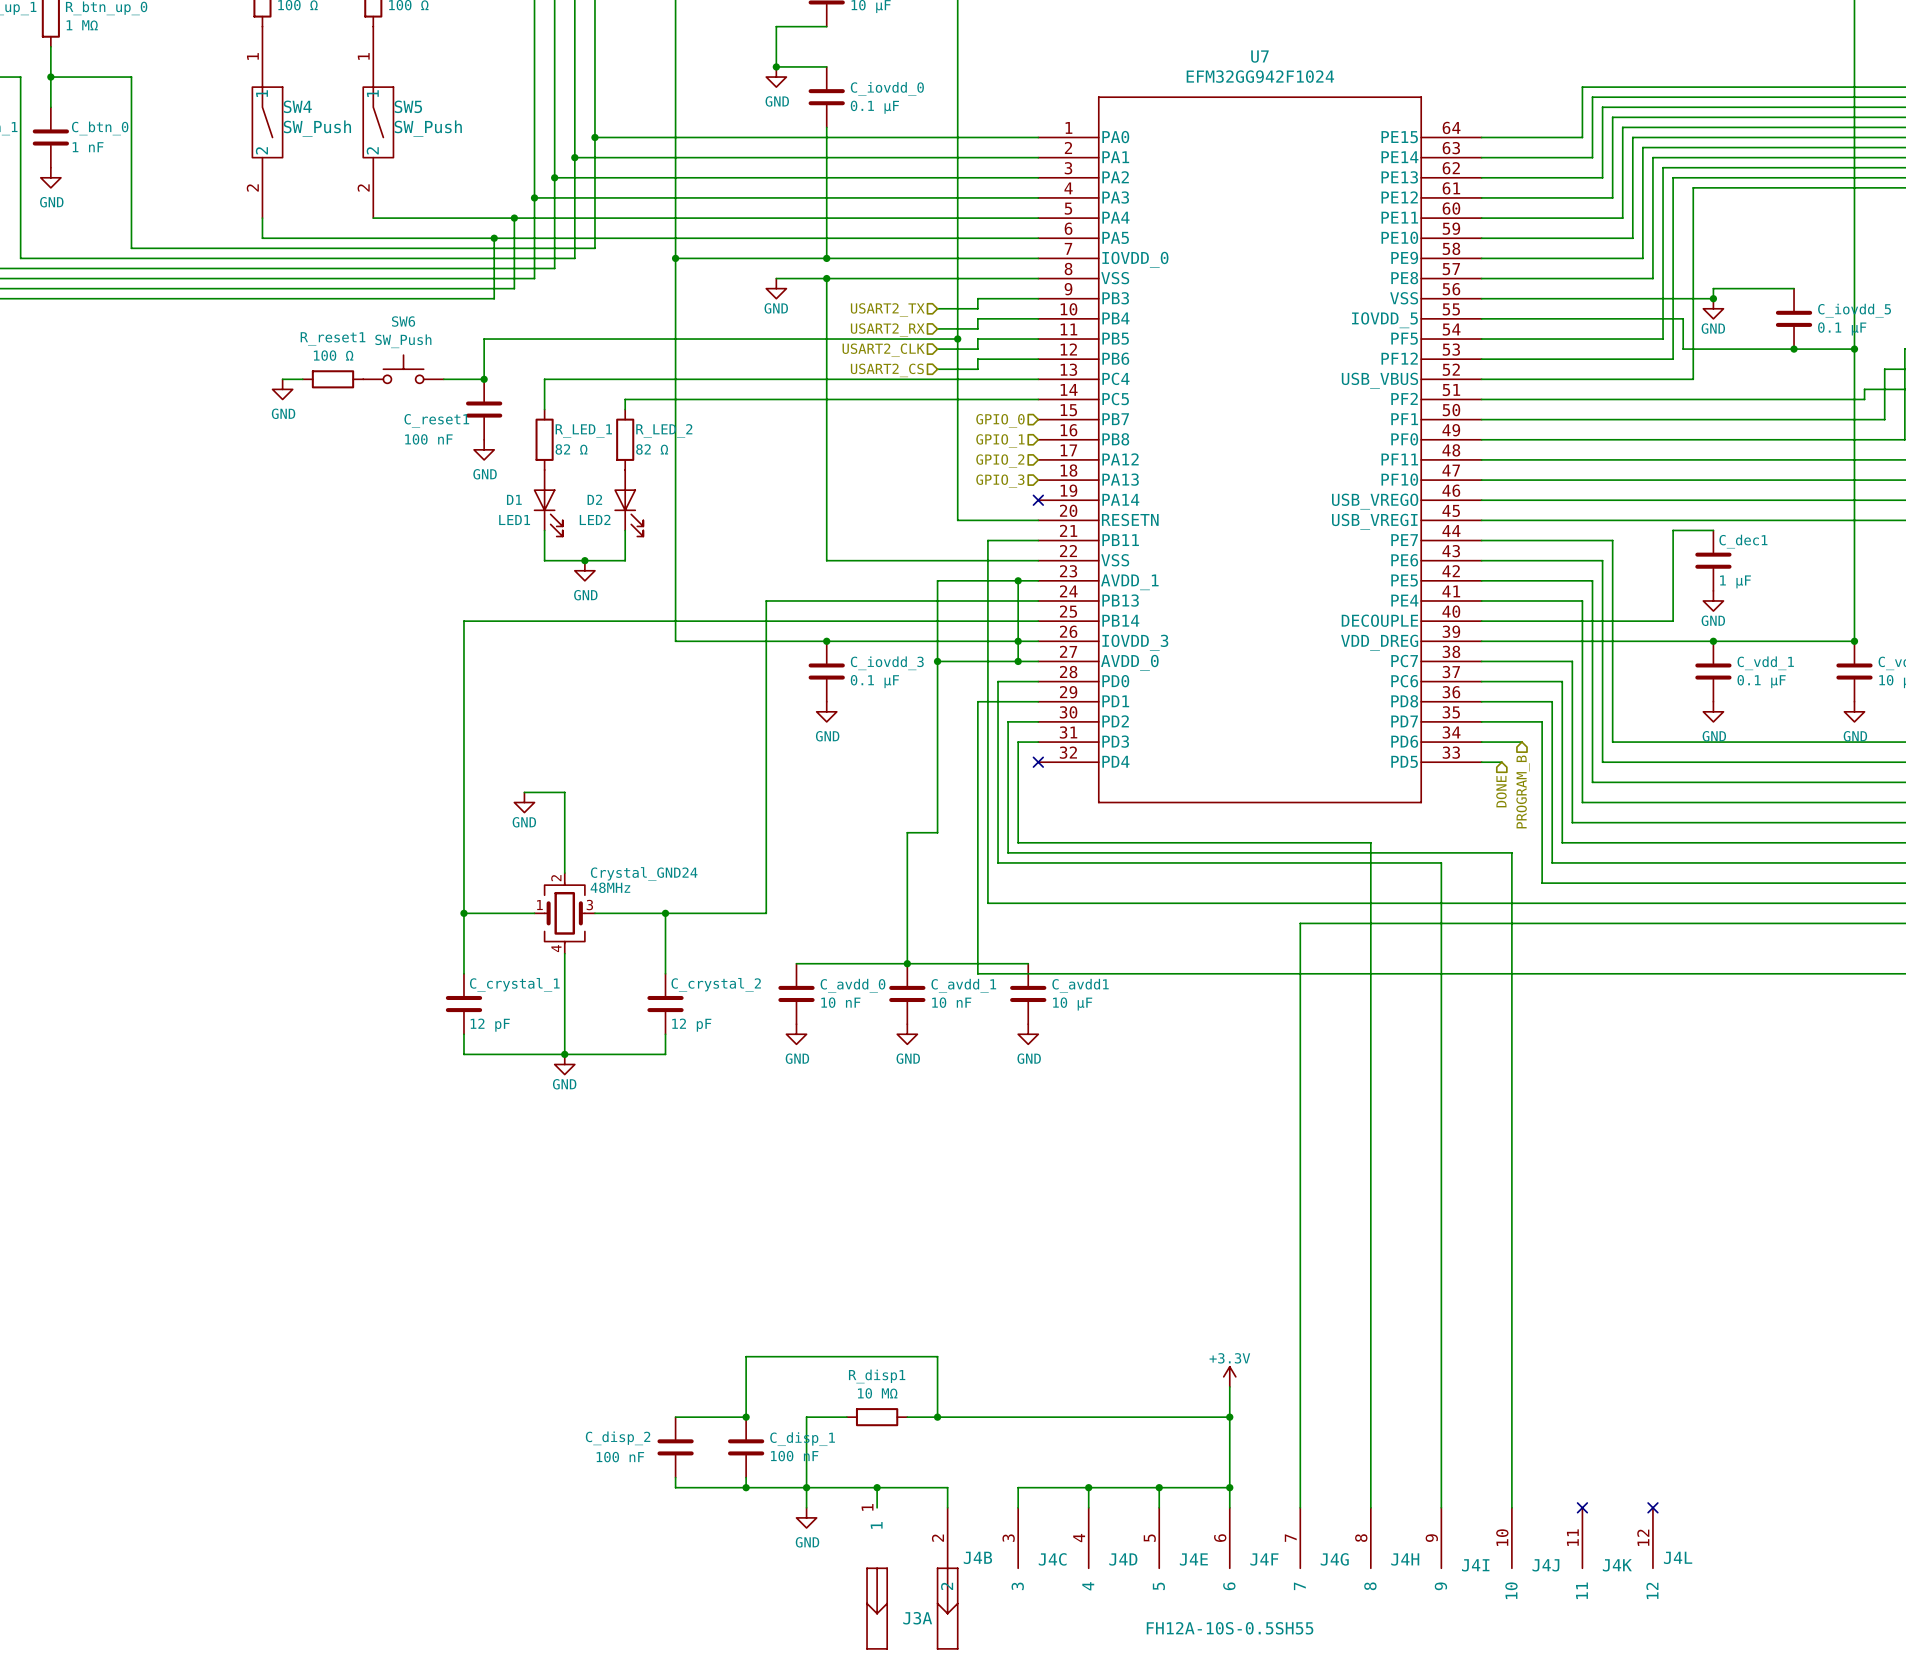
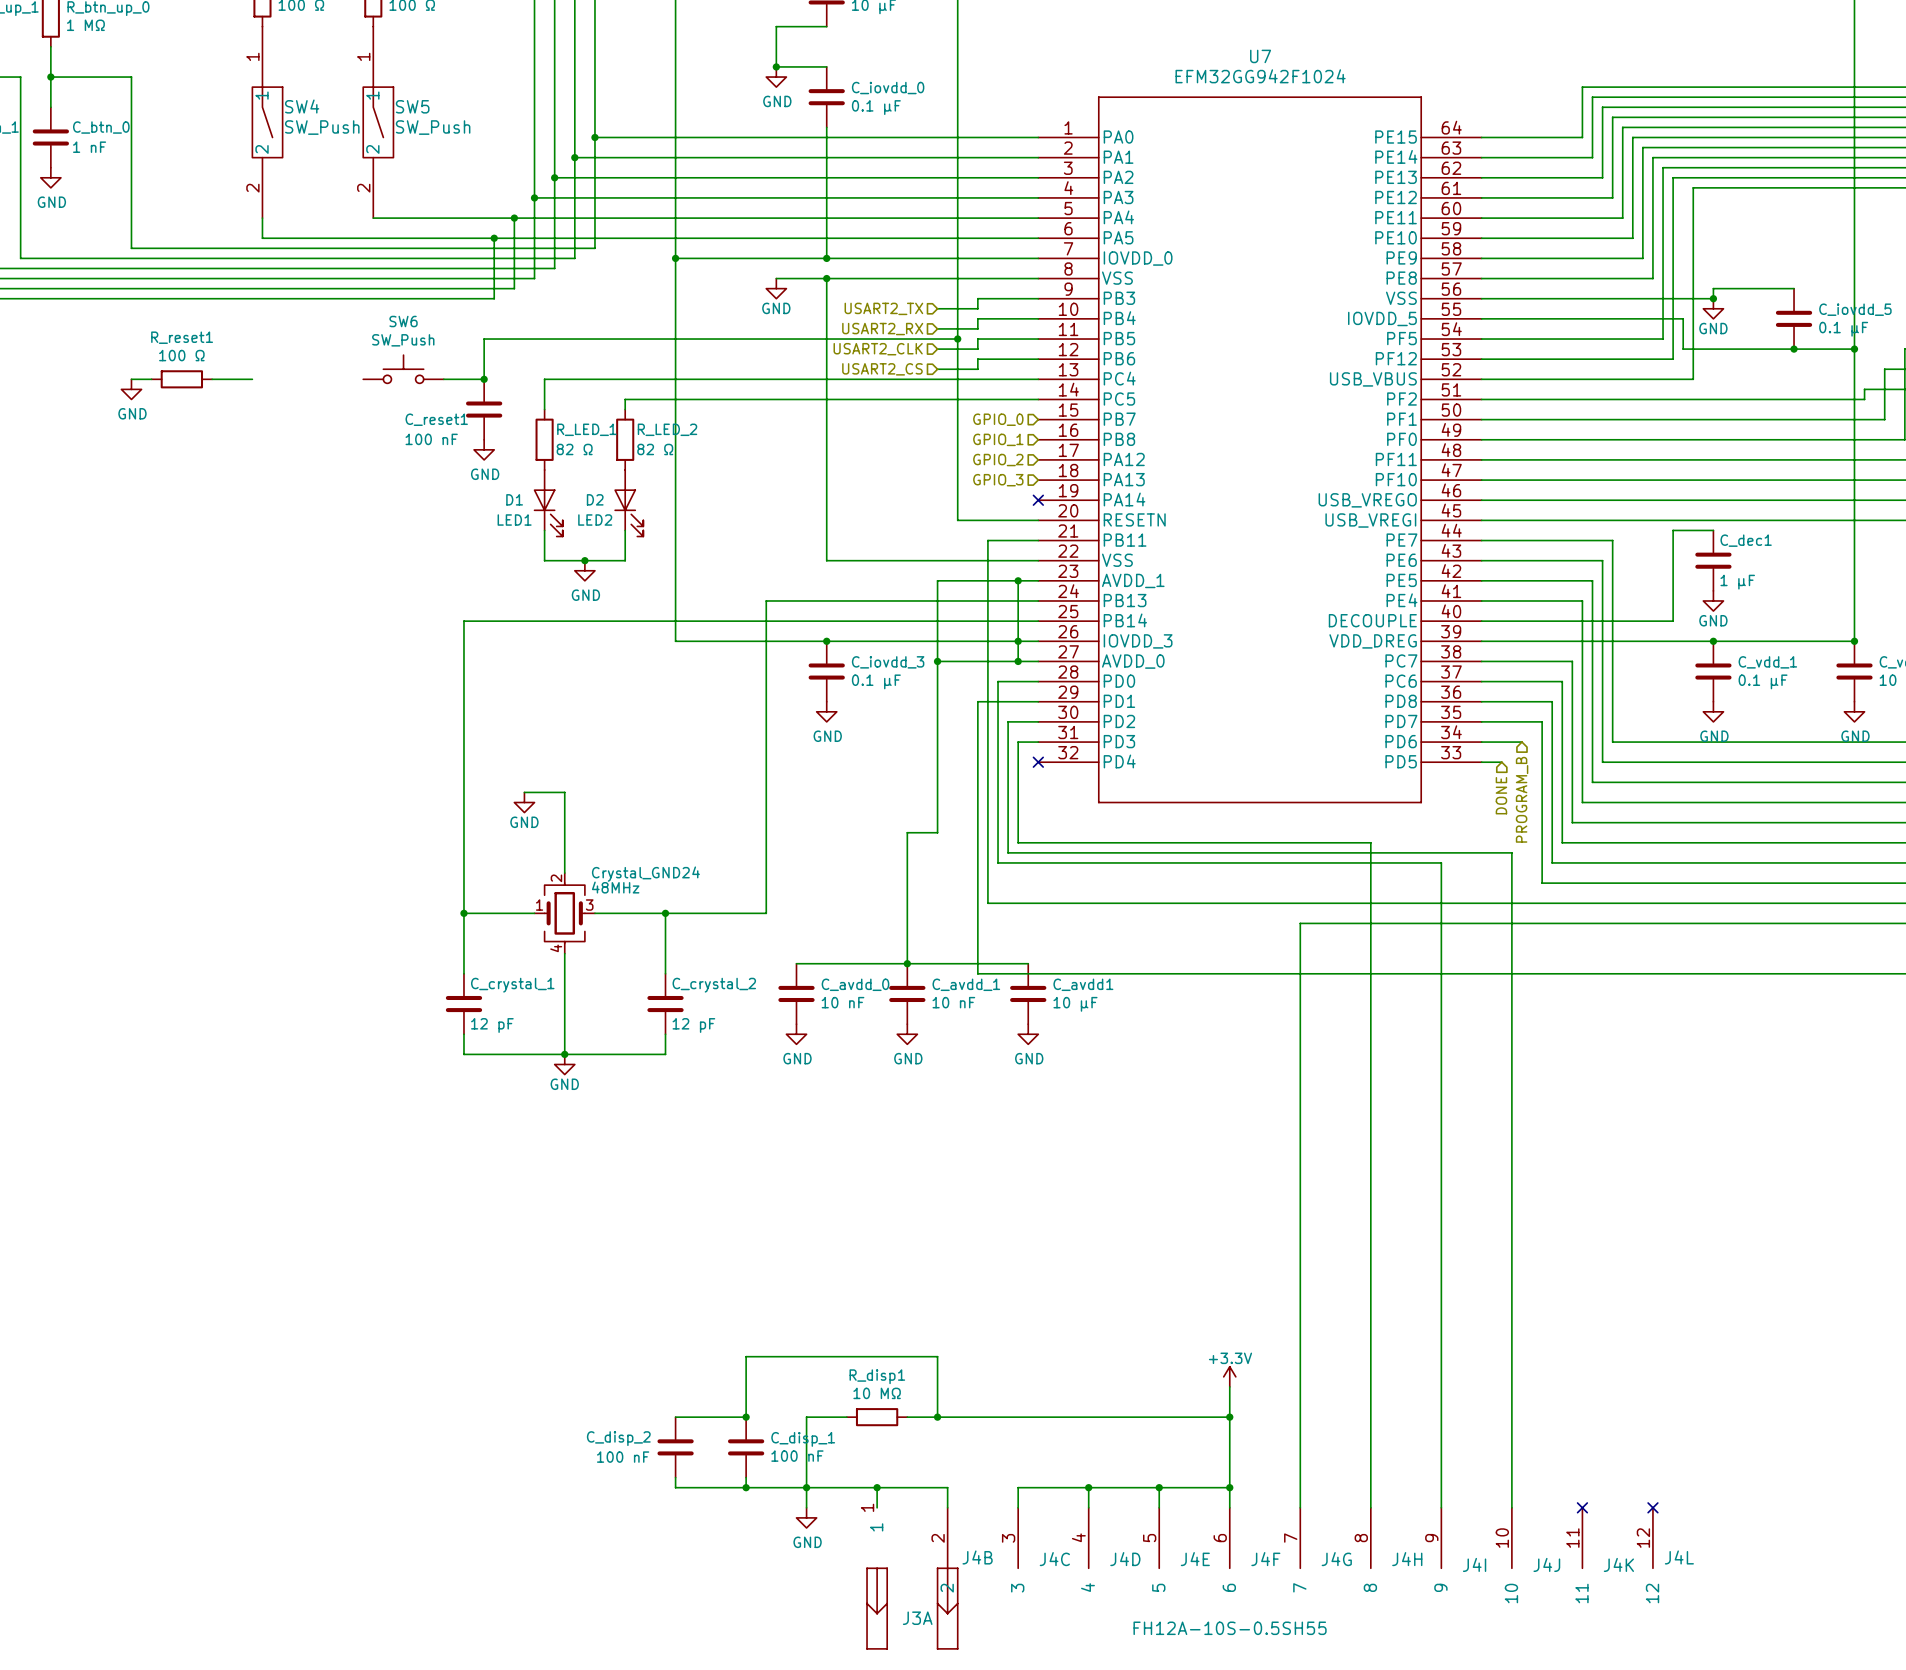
wire: none -> (212, 379) (252, 379)
wire: (282, 379) (302, 379) -> (131, 379) (151, 379)
R_reset1 position: (332, 379) -> (181, 379)
power symbol position: GND (282, 389) -> GND (131, 389)

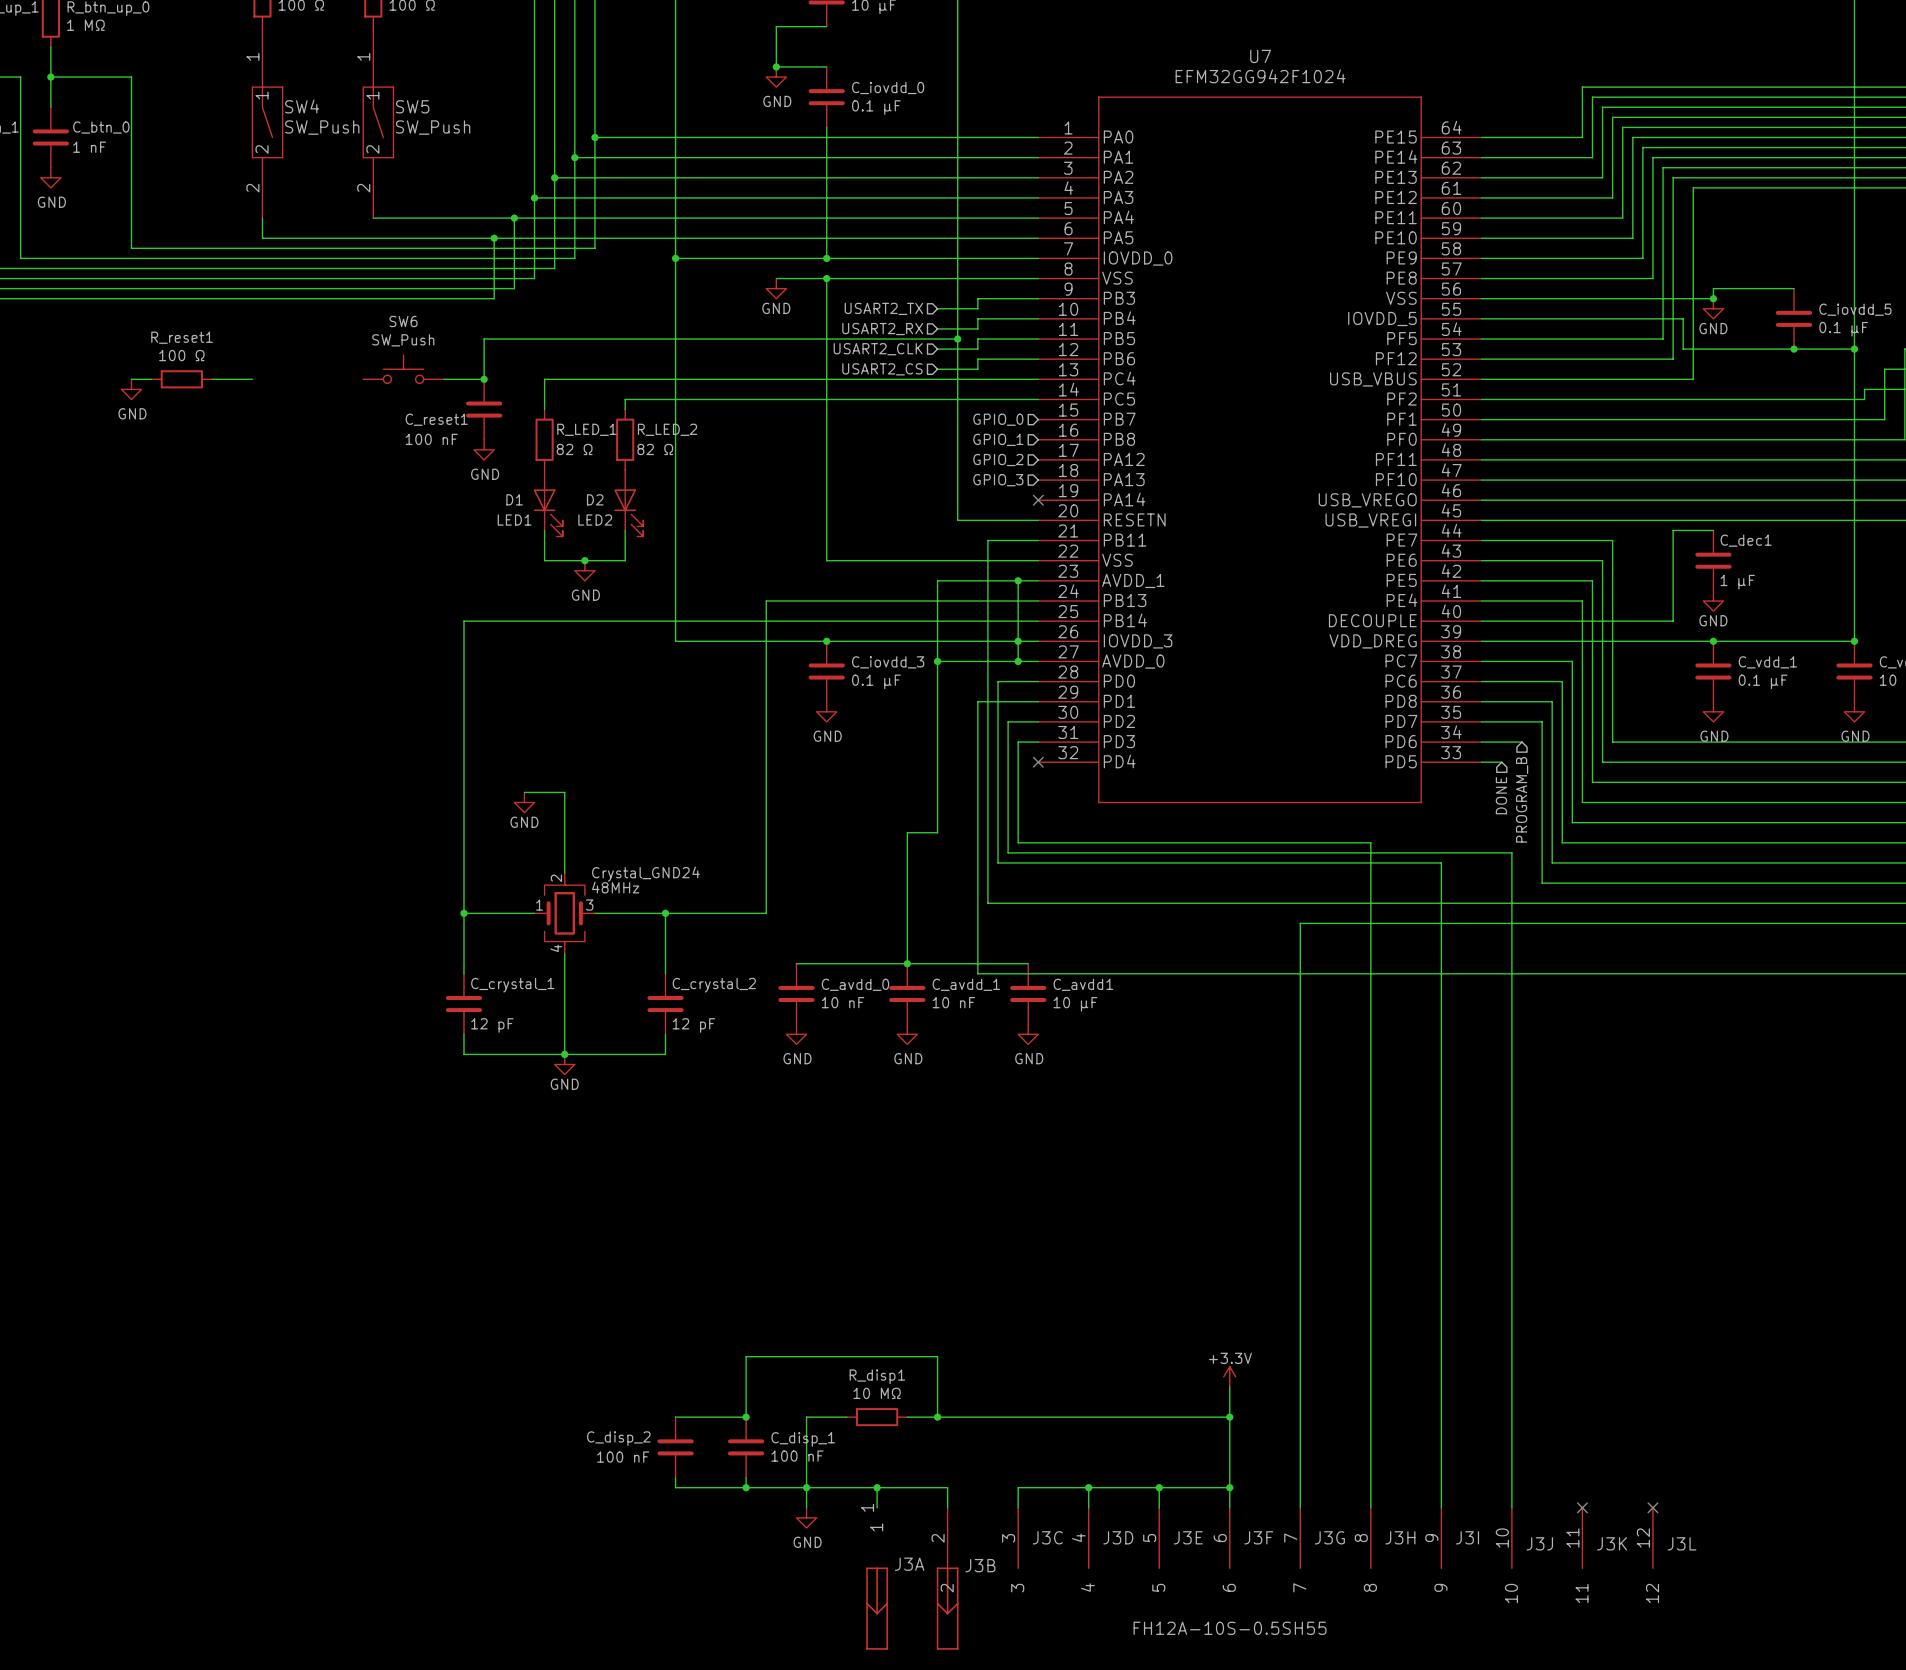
J4B name: J4B (977, 1557) -> J3B (980, 1565)
J4L name: J4L (1679, 1557) -> J3L (1681, 1543)
J4C name: J4C (1054, 1559) -> J3C (1047, 1537)
J4D name: J4D (1125, 1559) -> J3D (1118, 1537)
J4E name: J4E (1195, 1559) -> J3E (1188, 1537)
J4F name: J4F (1265, 1559) -> J3F (1258, 1537)
J4G name: J4G (1336, 1559) -> J3G (1329, 1537)
J4H name: J4H (1407, 1559) -> J3H (1400, 1537)
J4I name: J4I (1474, 1564) -> J3I (1467, 1537)
J4J name: J4J (1546, 1564) -> J3J (1539, 1543)
J4K name: J4K (1618, 1564) -> J3K (1612, 1543)
J3A name position: J3A (917, 1618) -> J3A (909, 1564)

